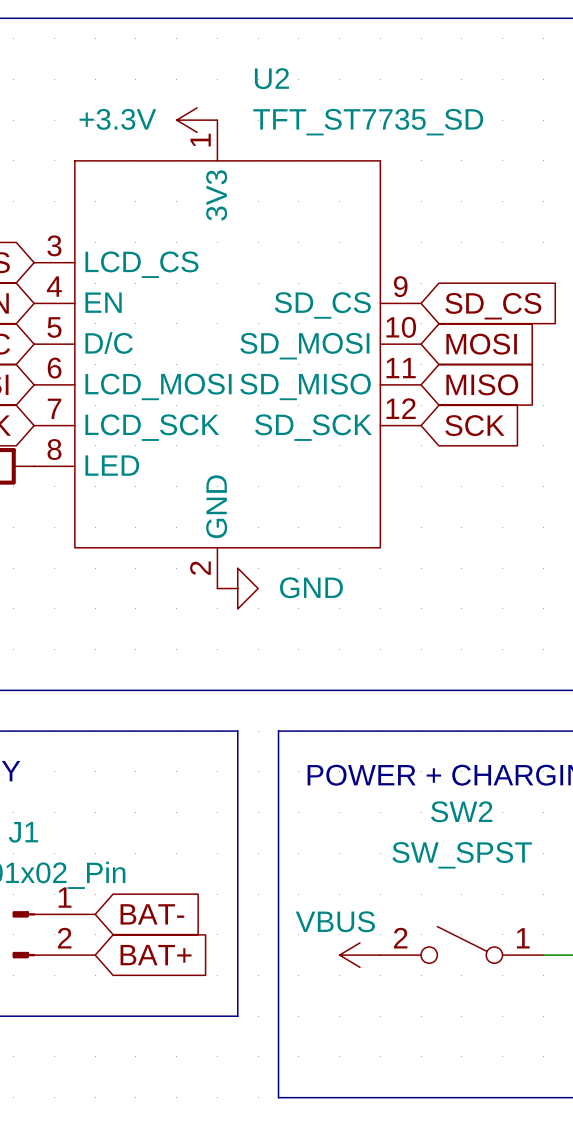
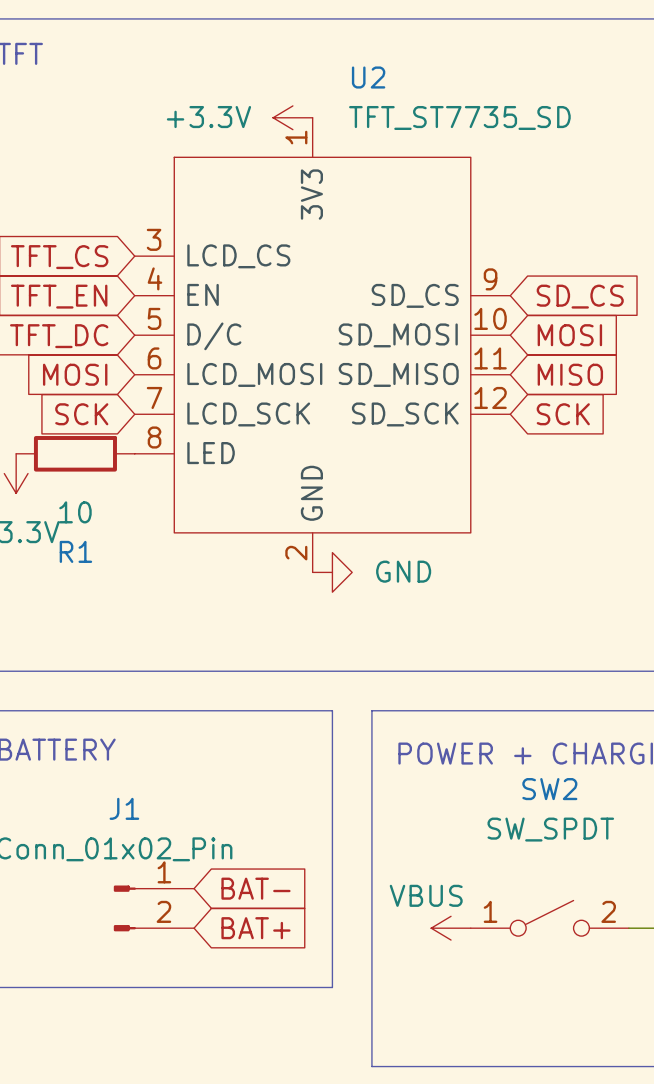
SW2 value: SW_SPST (462, 855) -> SW_SPDT (550, 829)
SW2 flip: as is (461, 944) -> left-right (549, 918)

